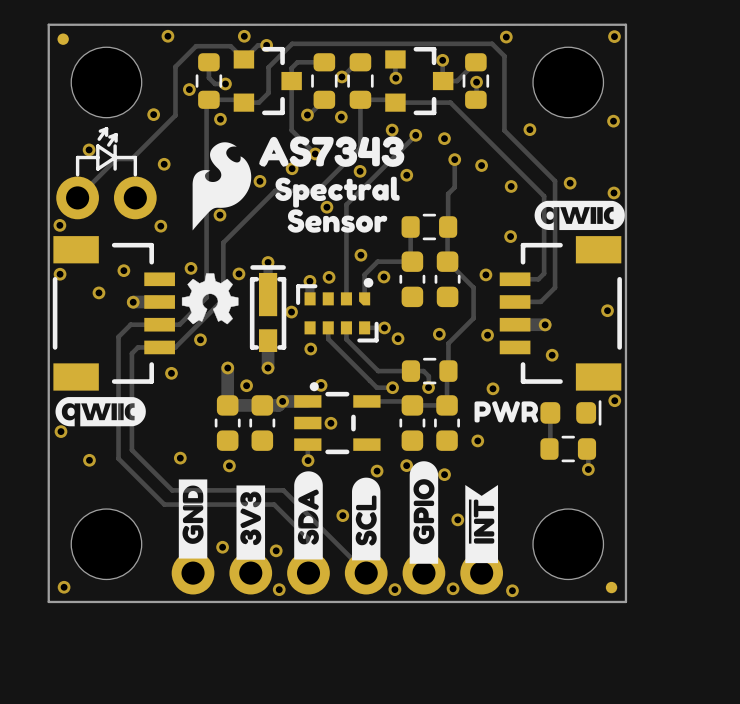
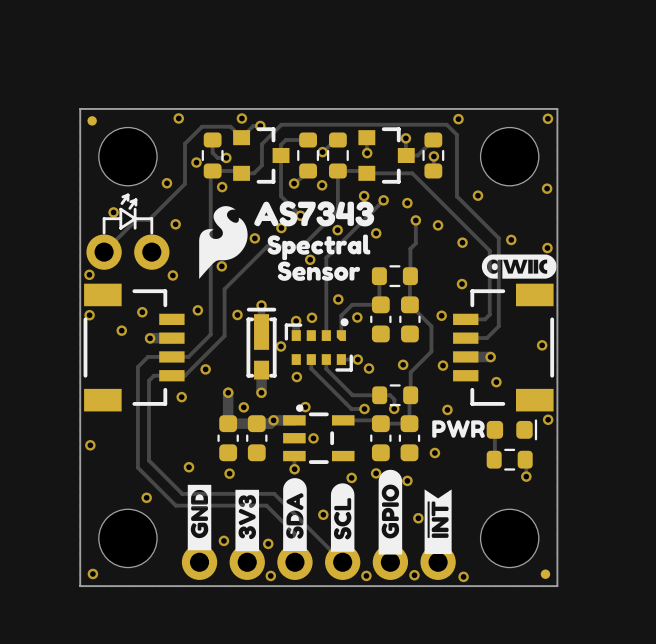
drawing: [181, 273, 239, 325] -> none
drawing: [55, 397, 146, 427] -> none
via position: (89, 460) -> (146, 497)

